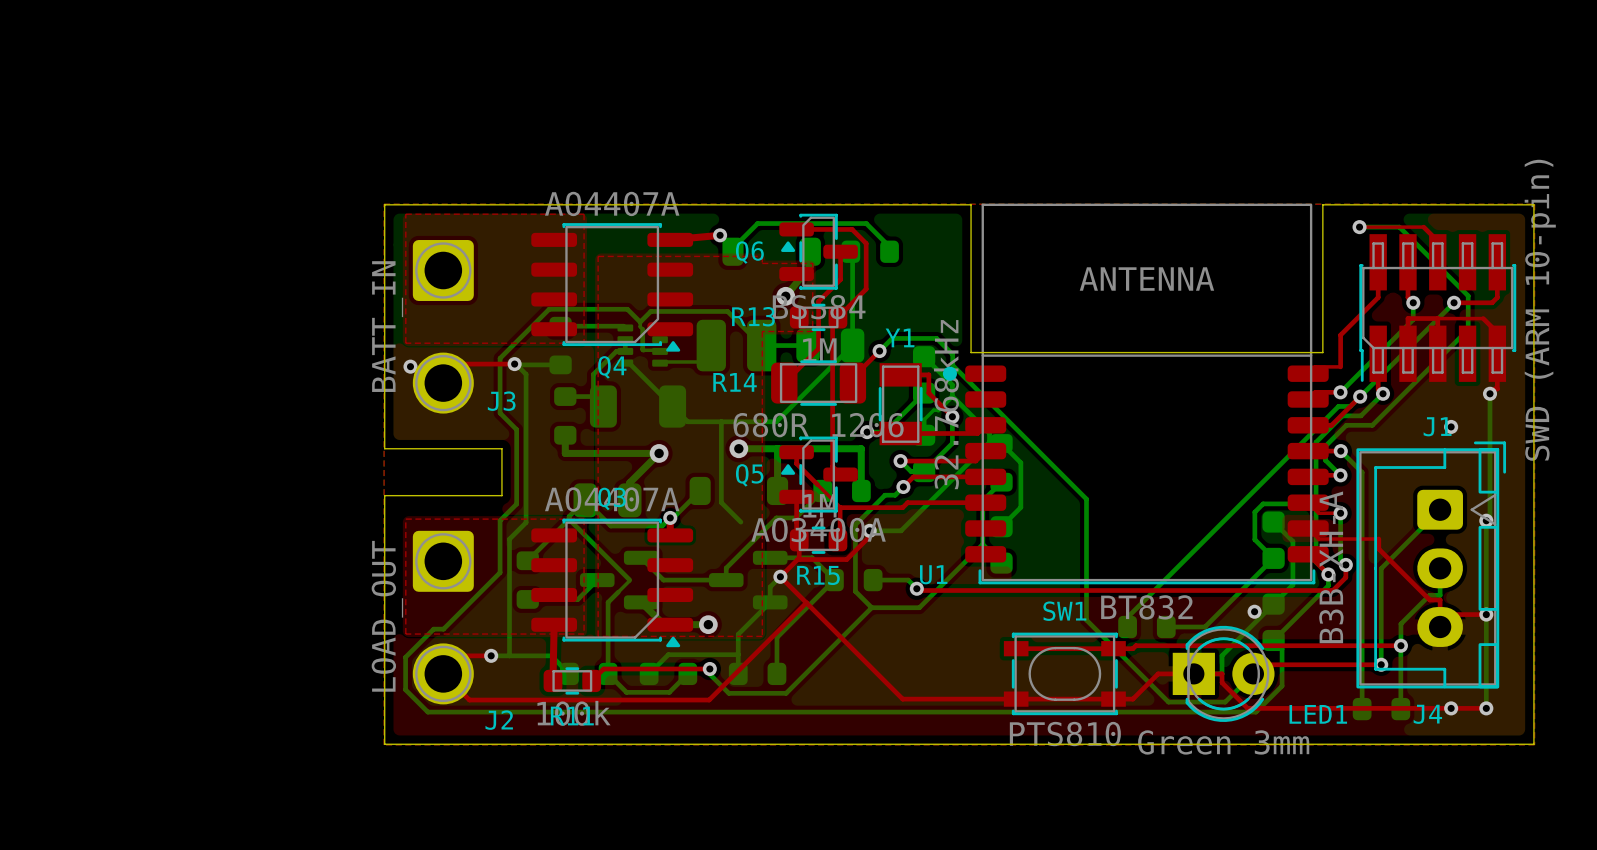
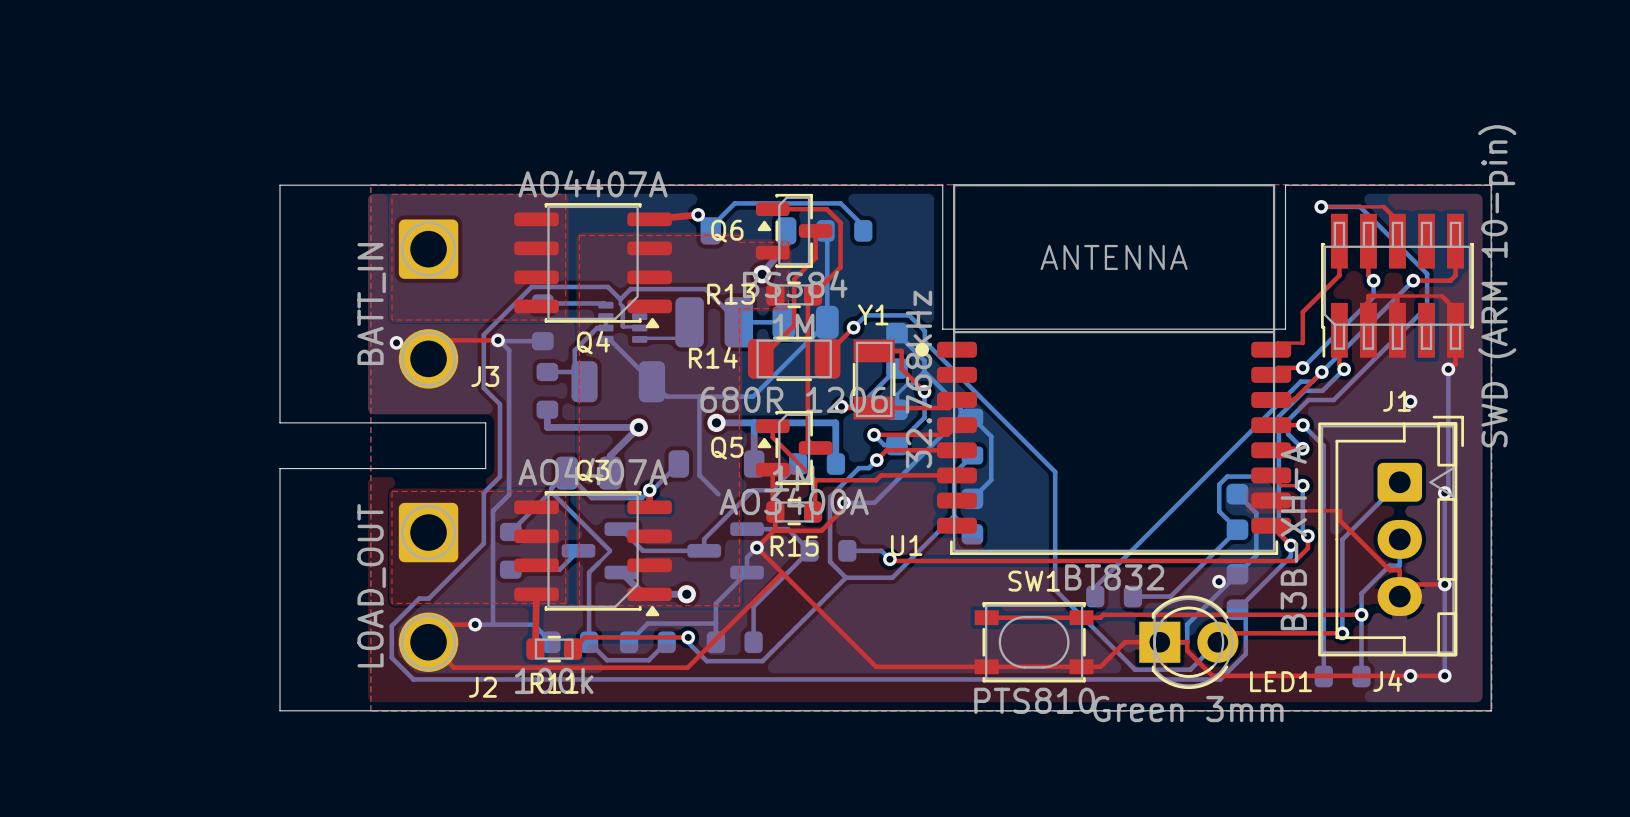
board edge: (384, 204) (384, 448) -> (371, 185) (280, 185) (280, 422) (371, 422)
board edge: (384, 495) (384, 744) -> (371, 468) (280, 468) (280, 710) (371, 710)

